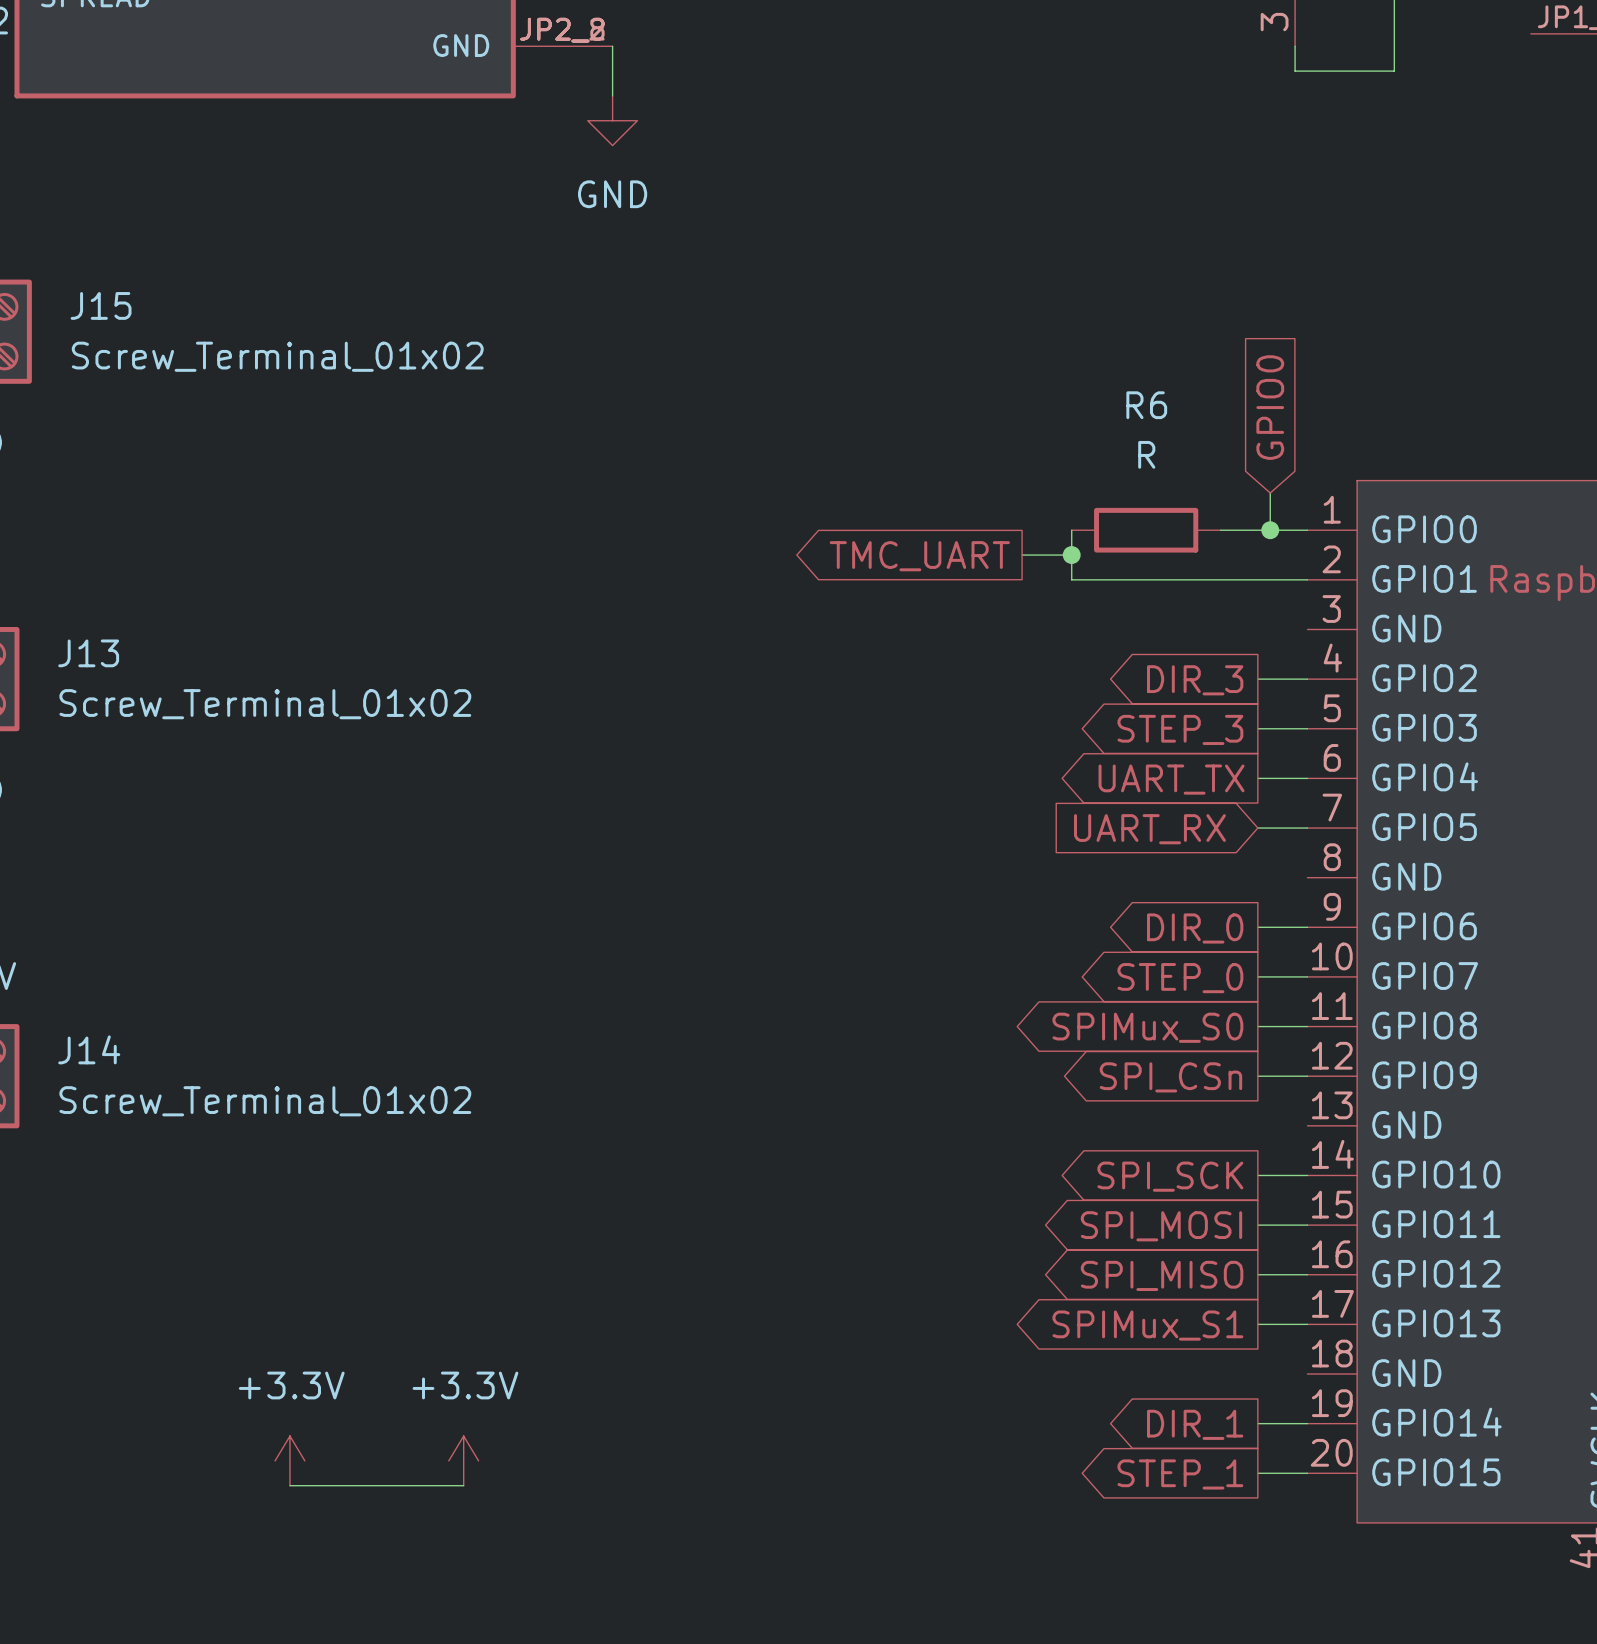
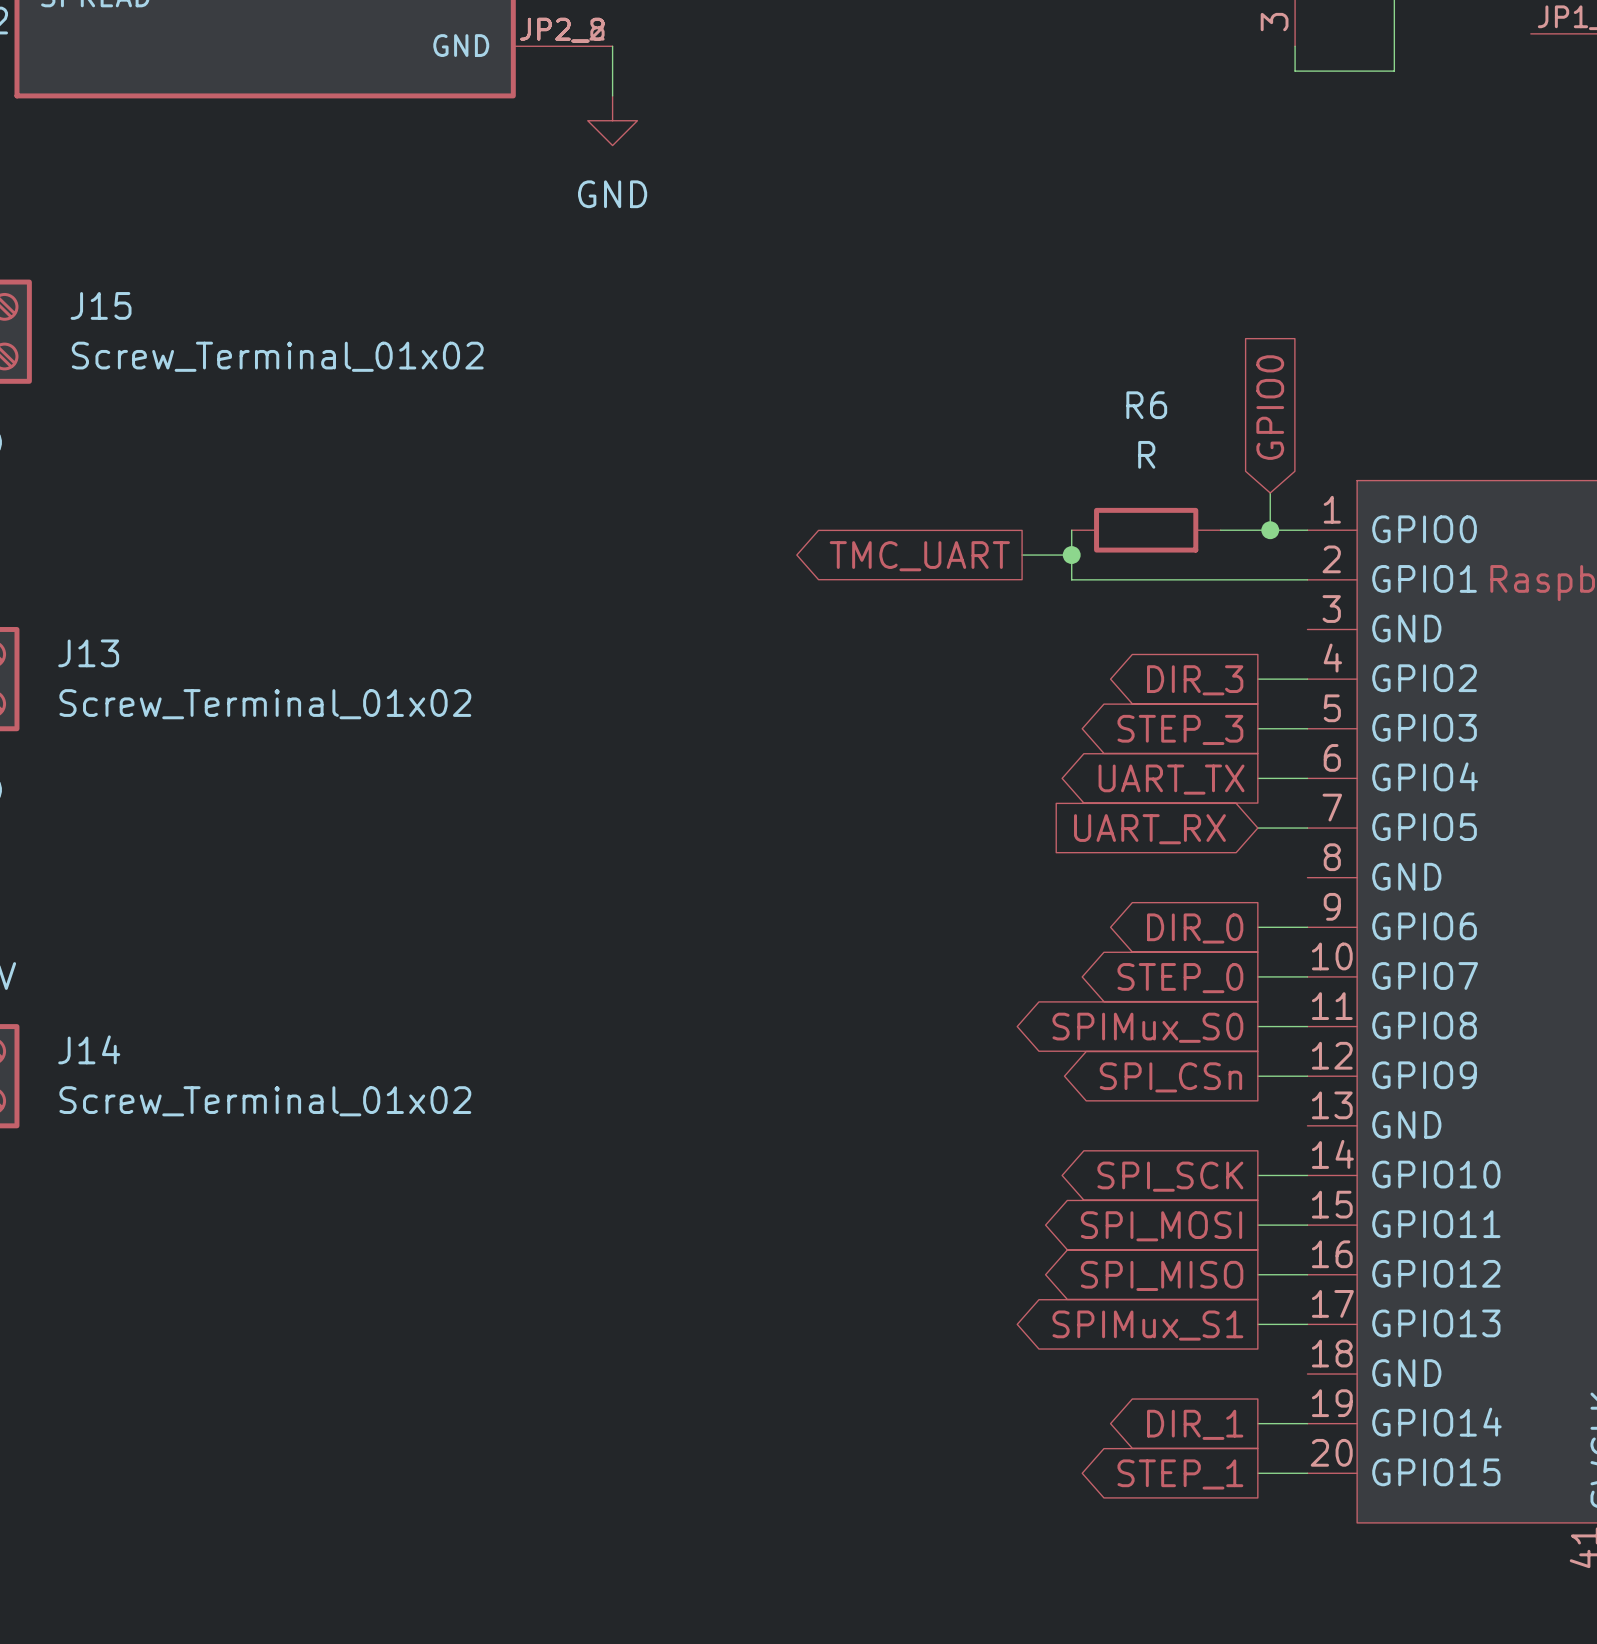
power symbol: +3.3V (289, 1460) -> none
power symbol: +3.3V (463, 1460) -> none
wire: (289, 1485) (463, 1485) -> none

